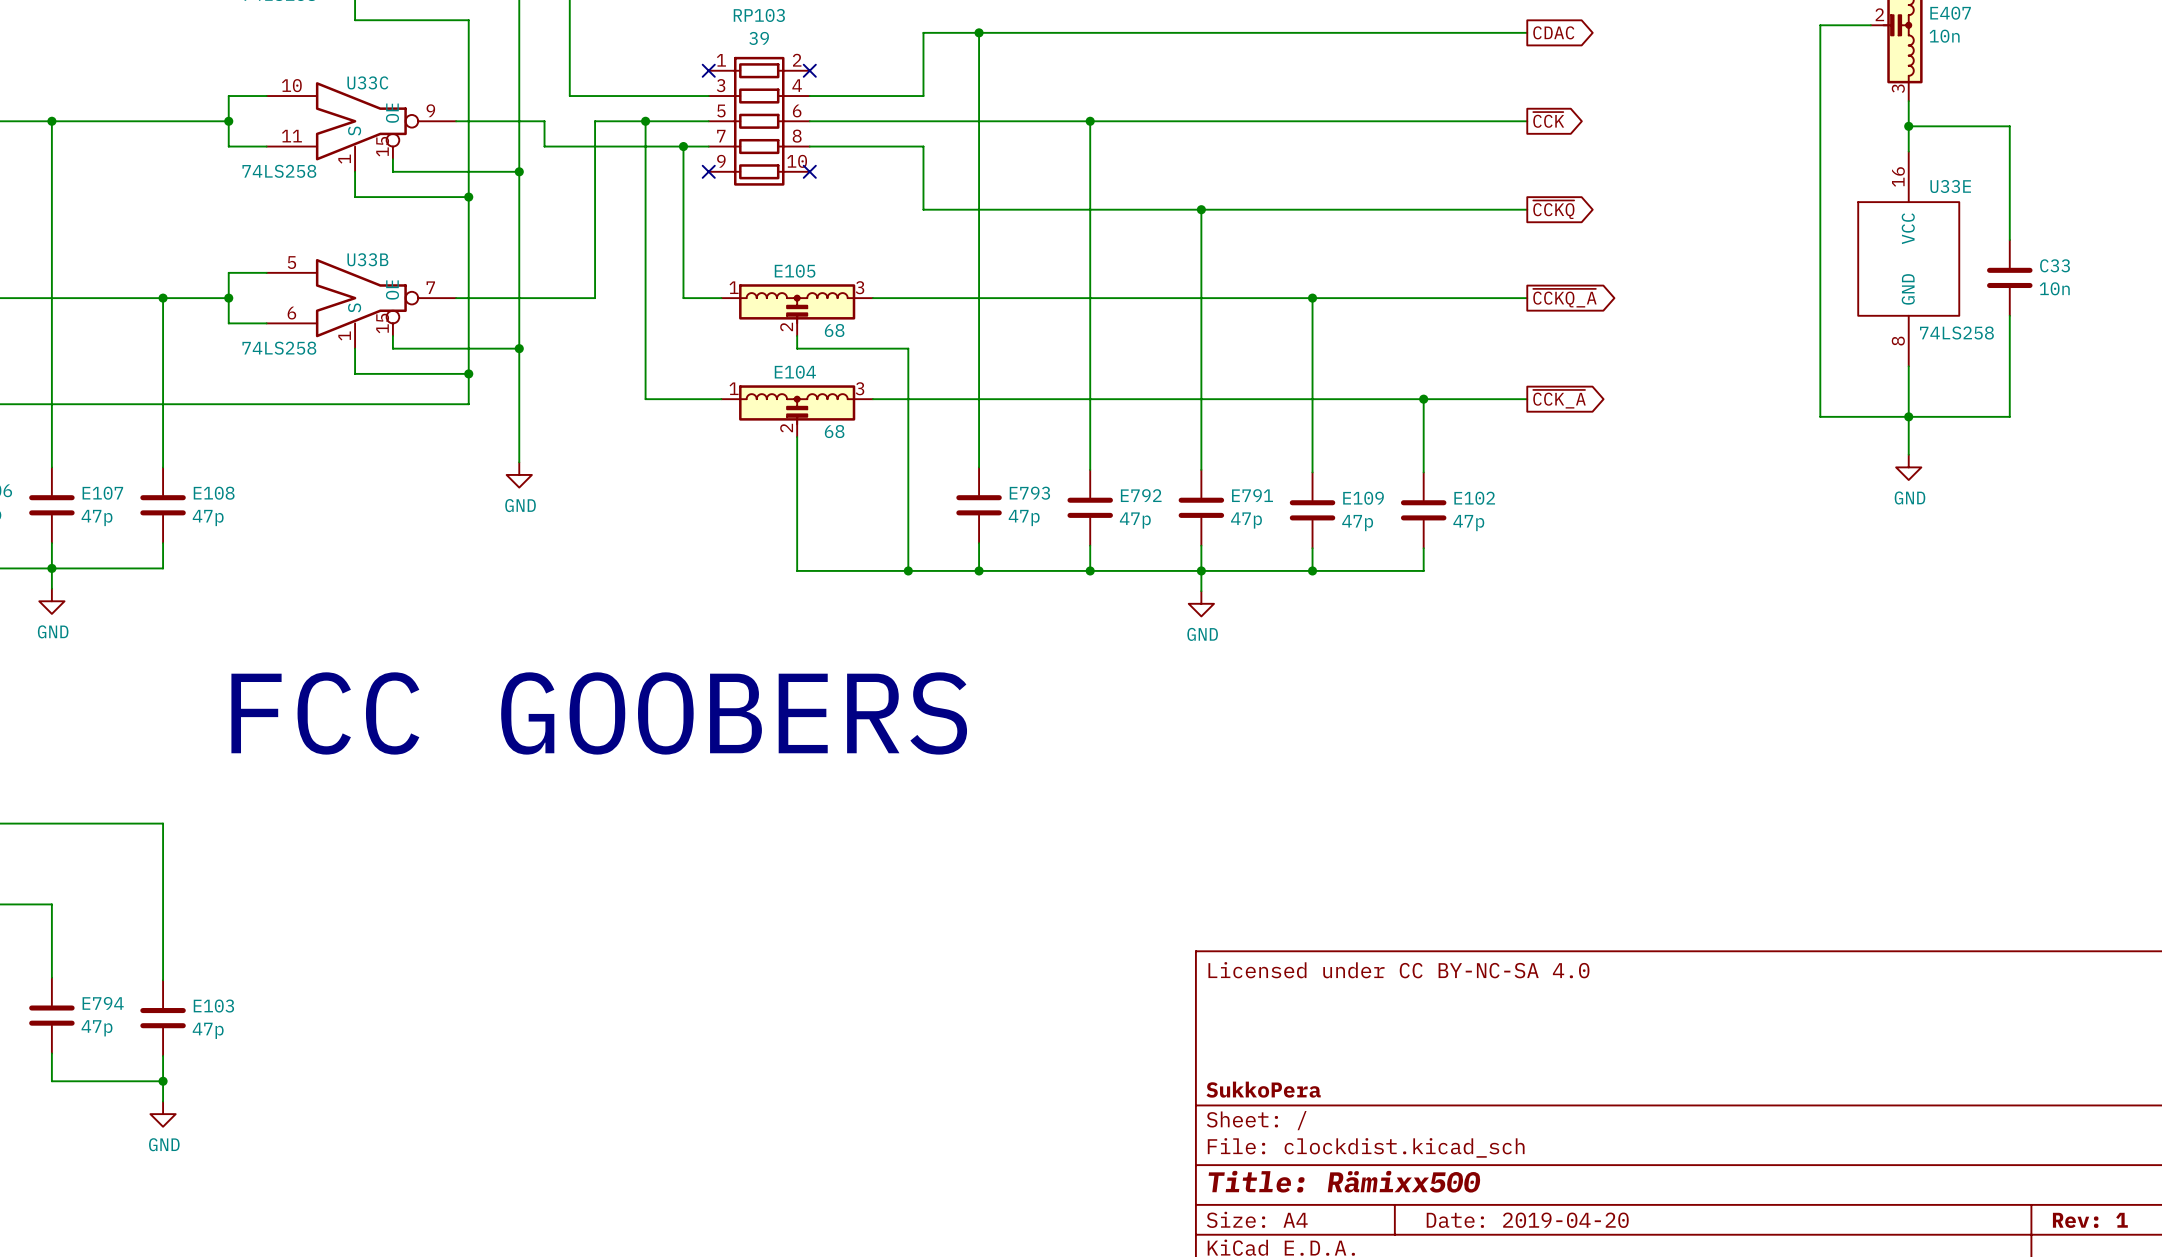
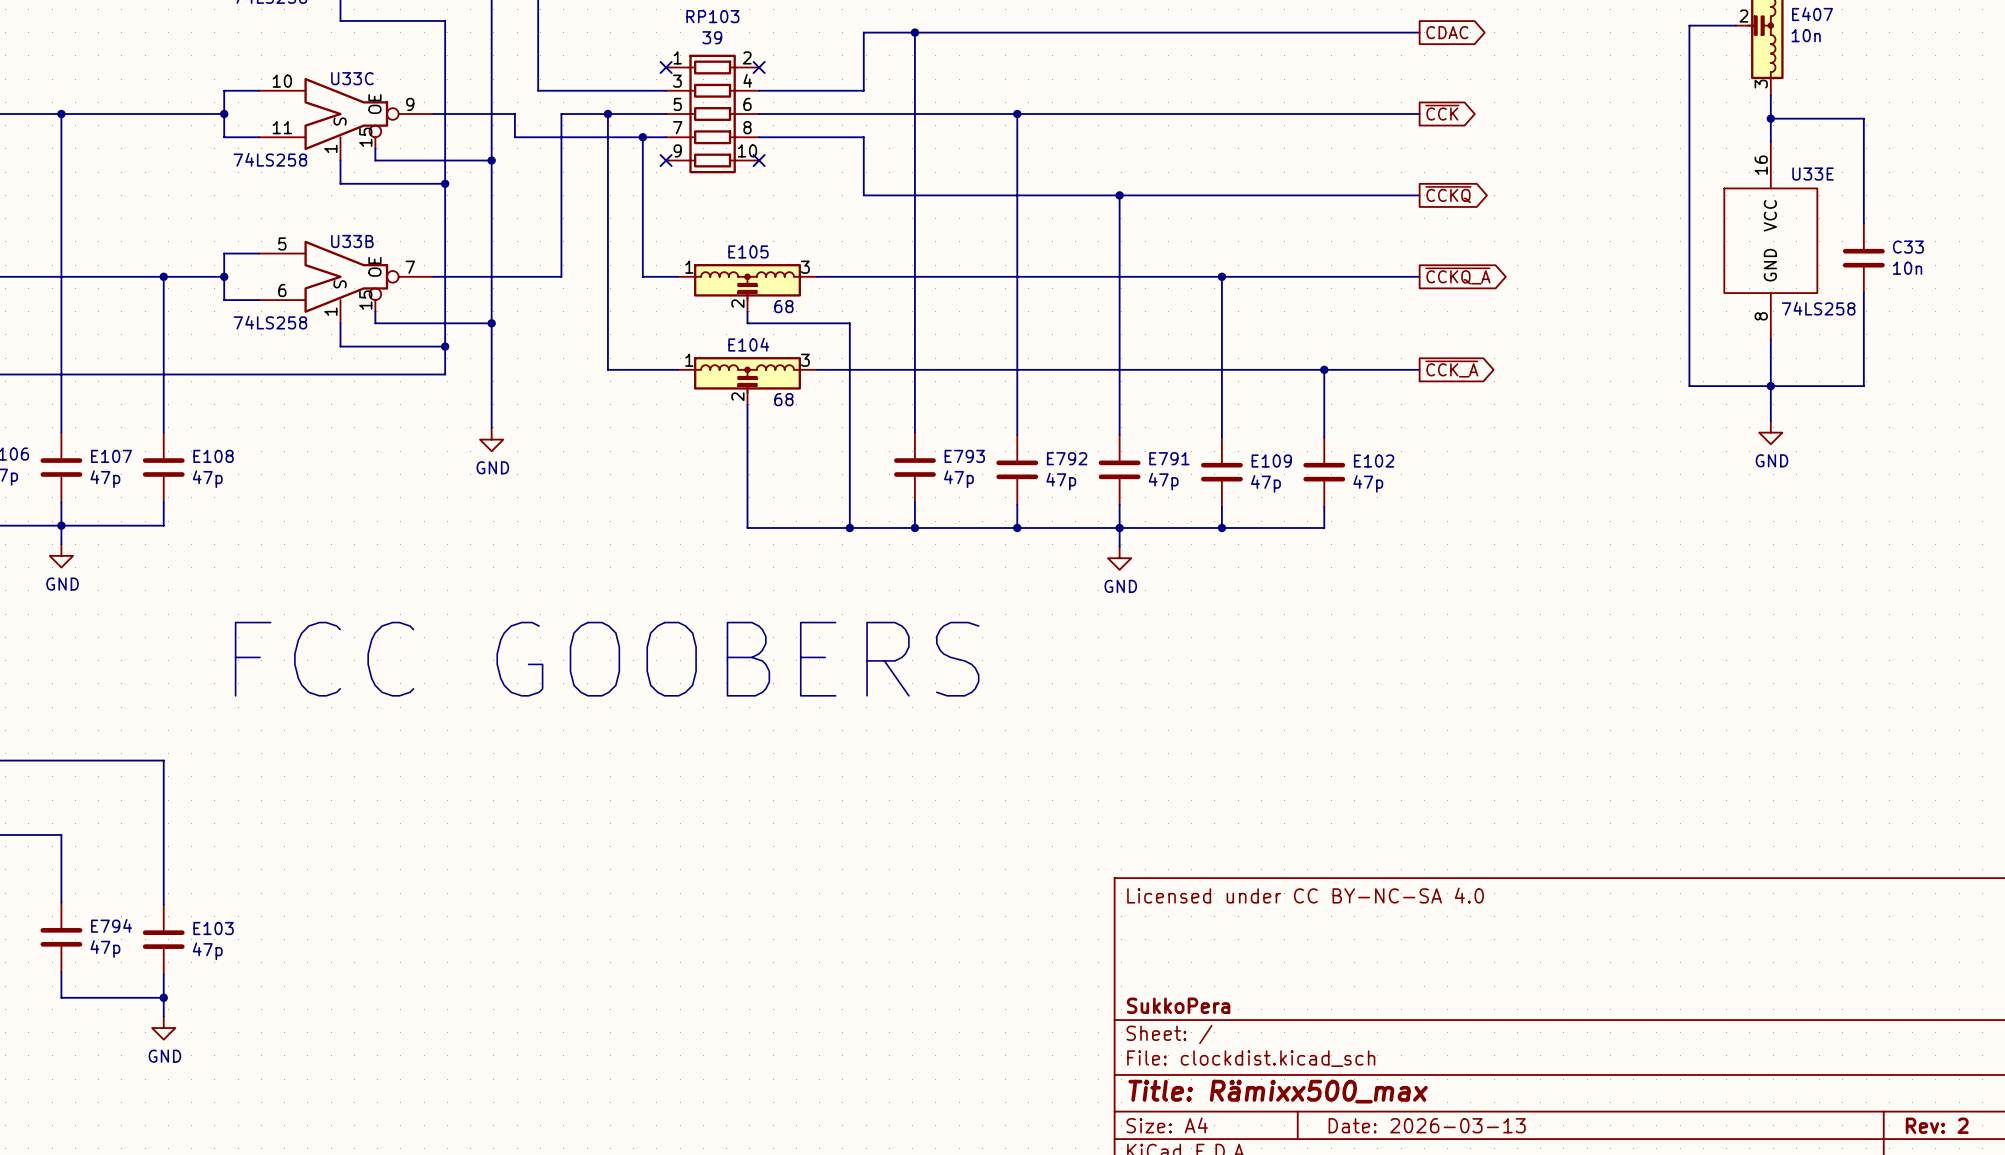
title block: Title: Rämixx500 (1344, 1181) -> Title: Rämixx500_max (1278, 1091)
title block: Date: 2019-04-20 (1527, 1220) -> Date: 2026-03-13 (1427, 1125)
title block: Rev: 1 (2090, 1220) -> Rev: 2 (1937, 1125)

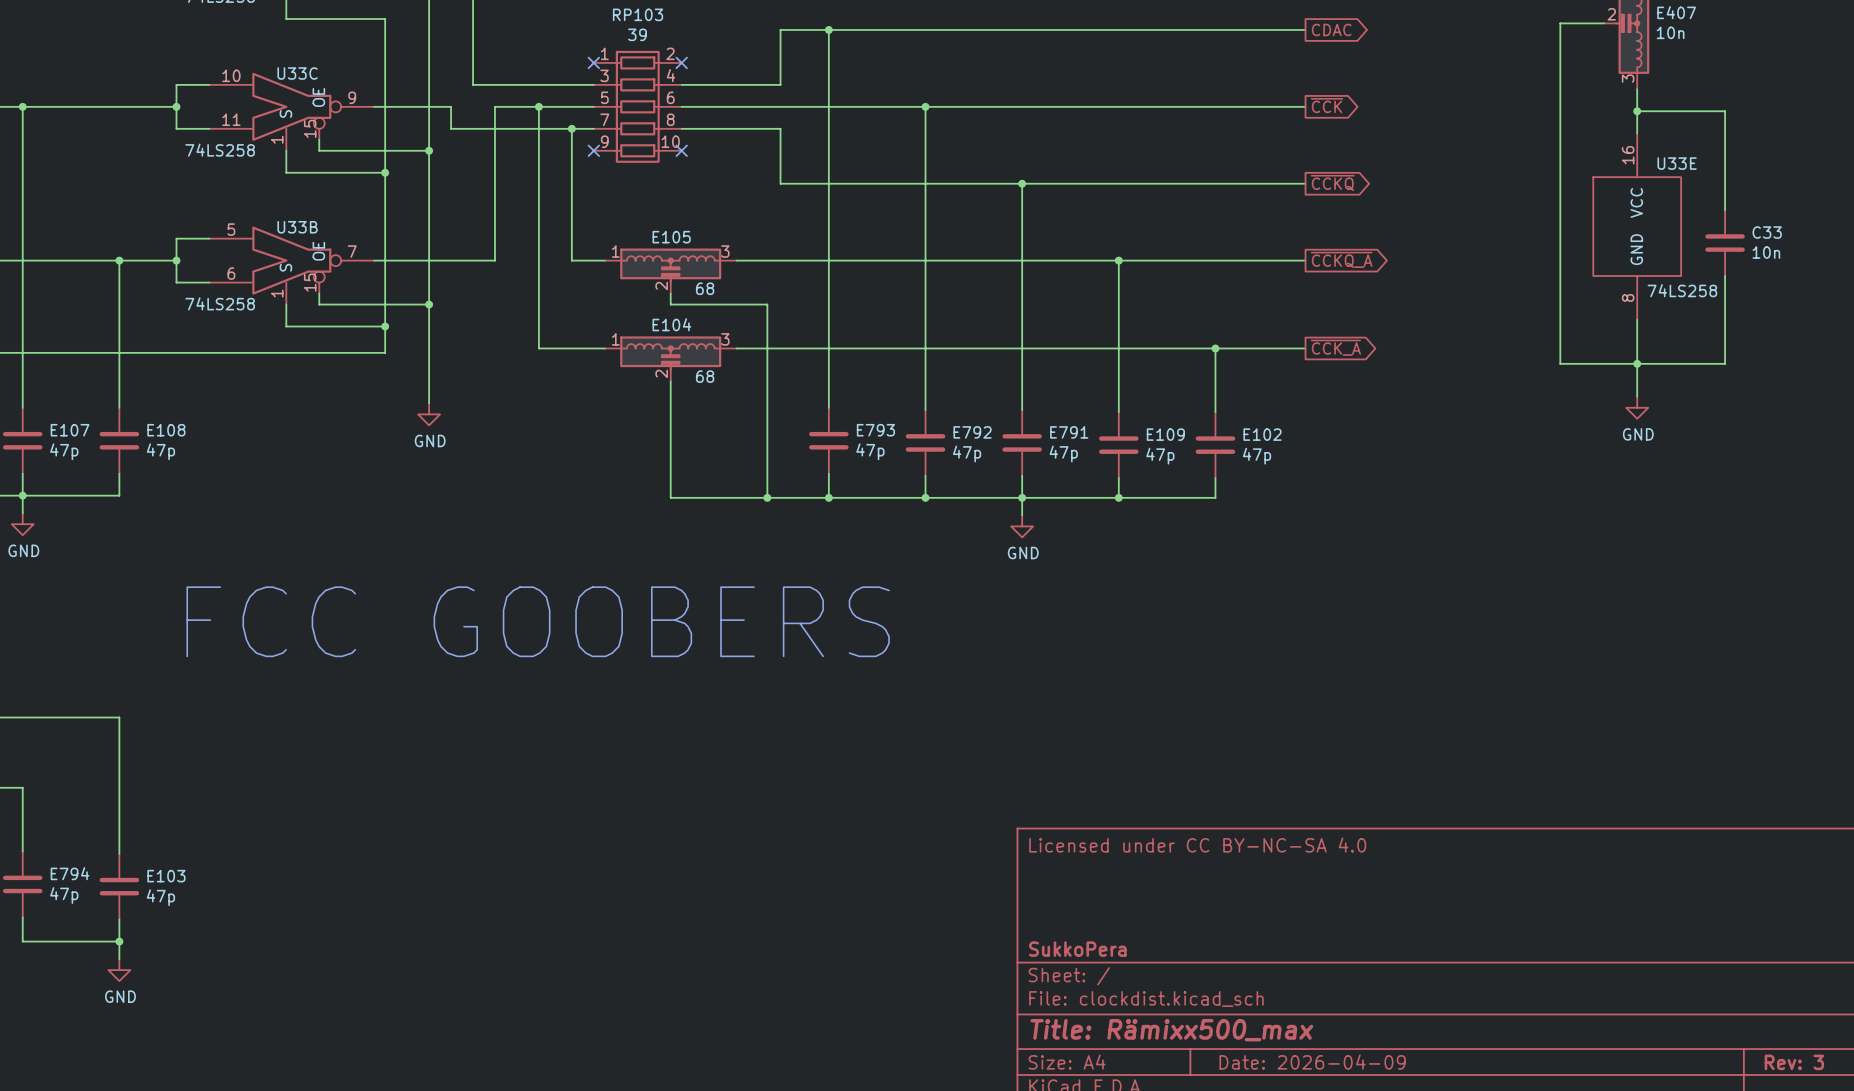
title block: Date: 2026-03-13 (1427, 1125) -> Date: 2026-04-09 (1312, 1062)
title block: Rev: 2 (1937, 1125) -> Rev: 3 (1794, 1062)

